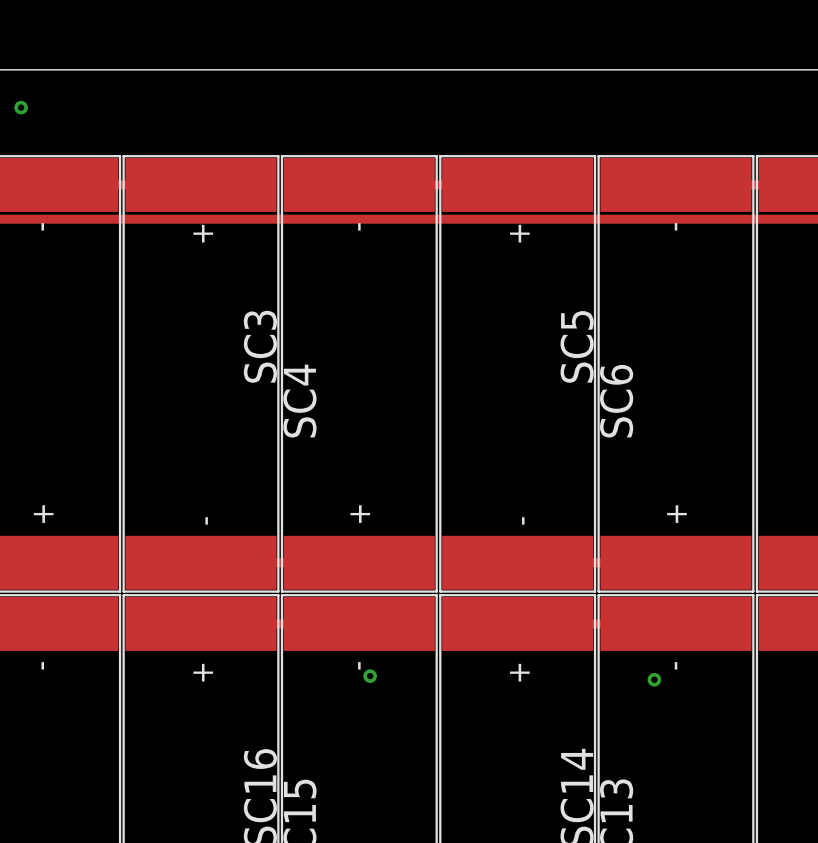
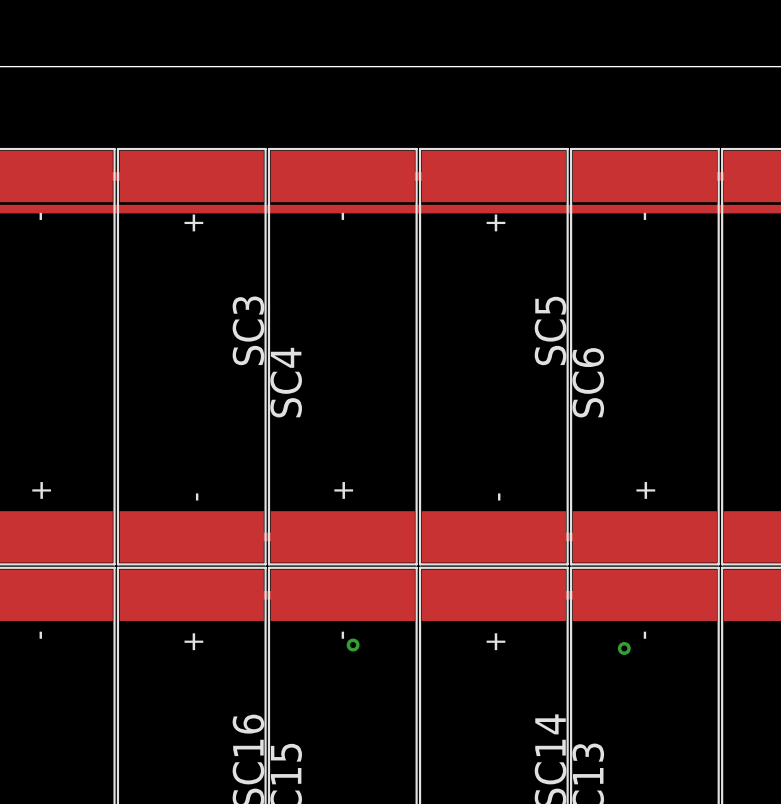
via: (21, 107) -> none

